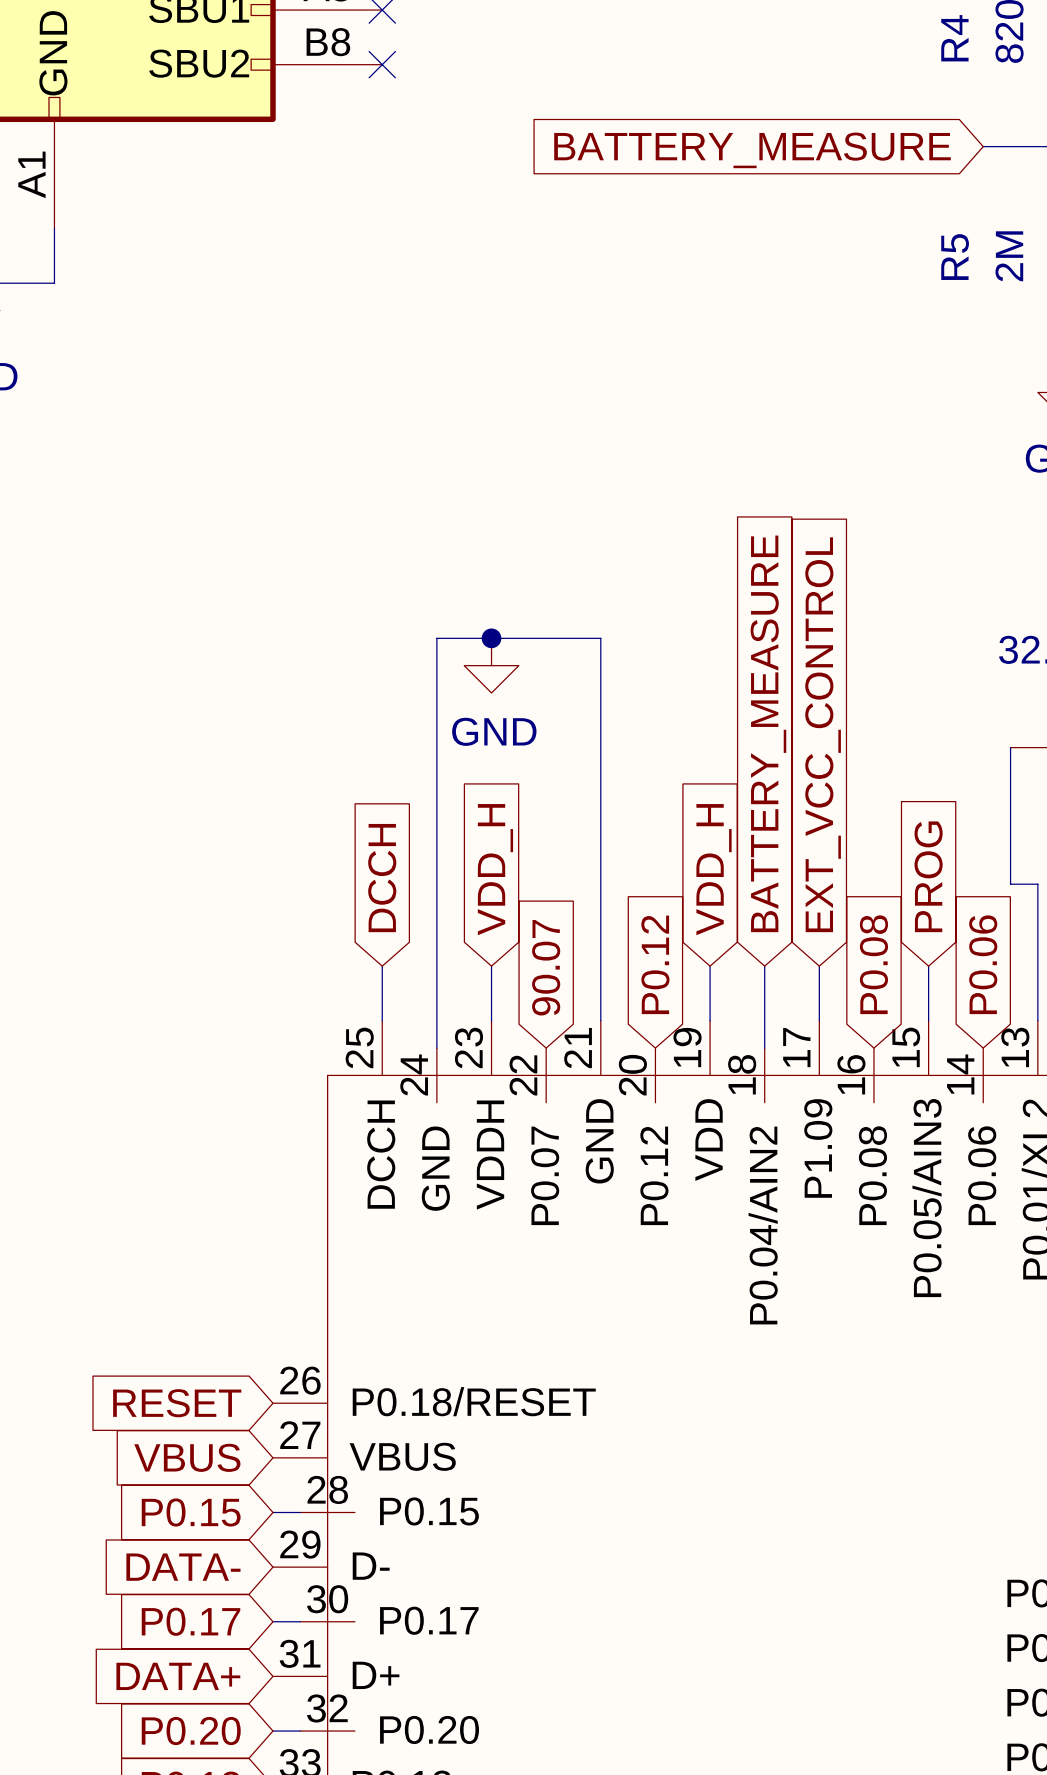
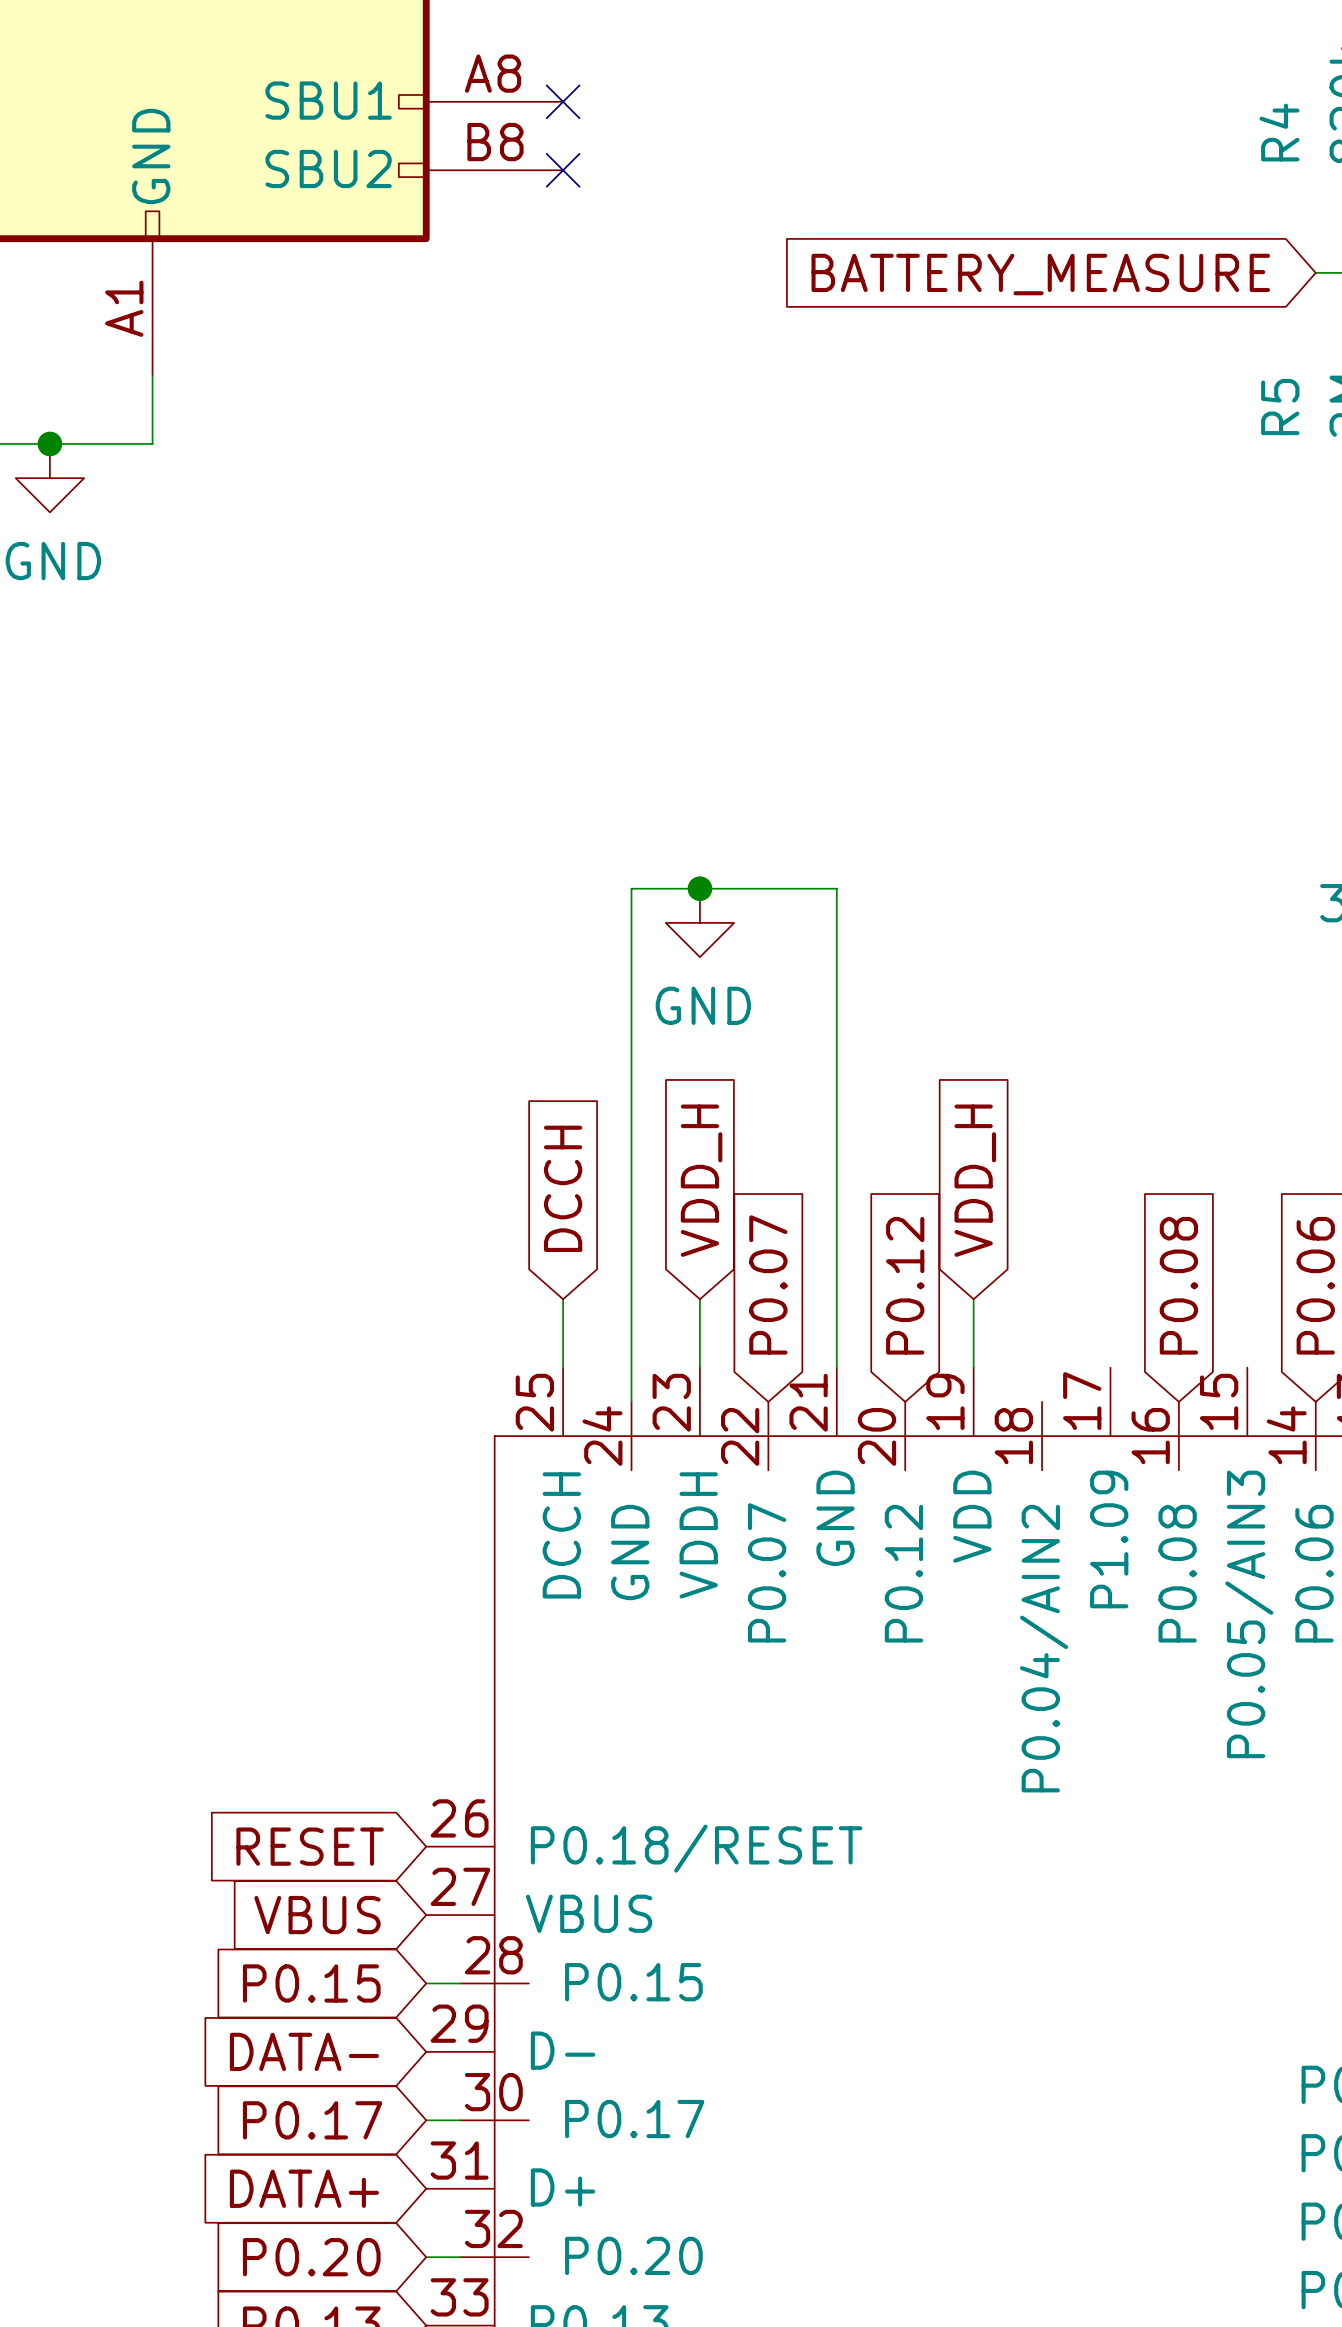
global label: BATTERY_MEASURE (768, 733) -> none
global label: EXT_VCC_CONTROL (823, 734) -> none
global label: PROG (928, 876) -> none
wire: (764, 966) (764, 1048) -> none
wire: (819, 966) (819, 1020) -> none
wire: (928, 966) (928, 1020) -> none
global label: 90.07 (546, 967) -> P0.07 (768, 1284)

